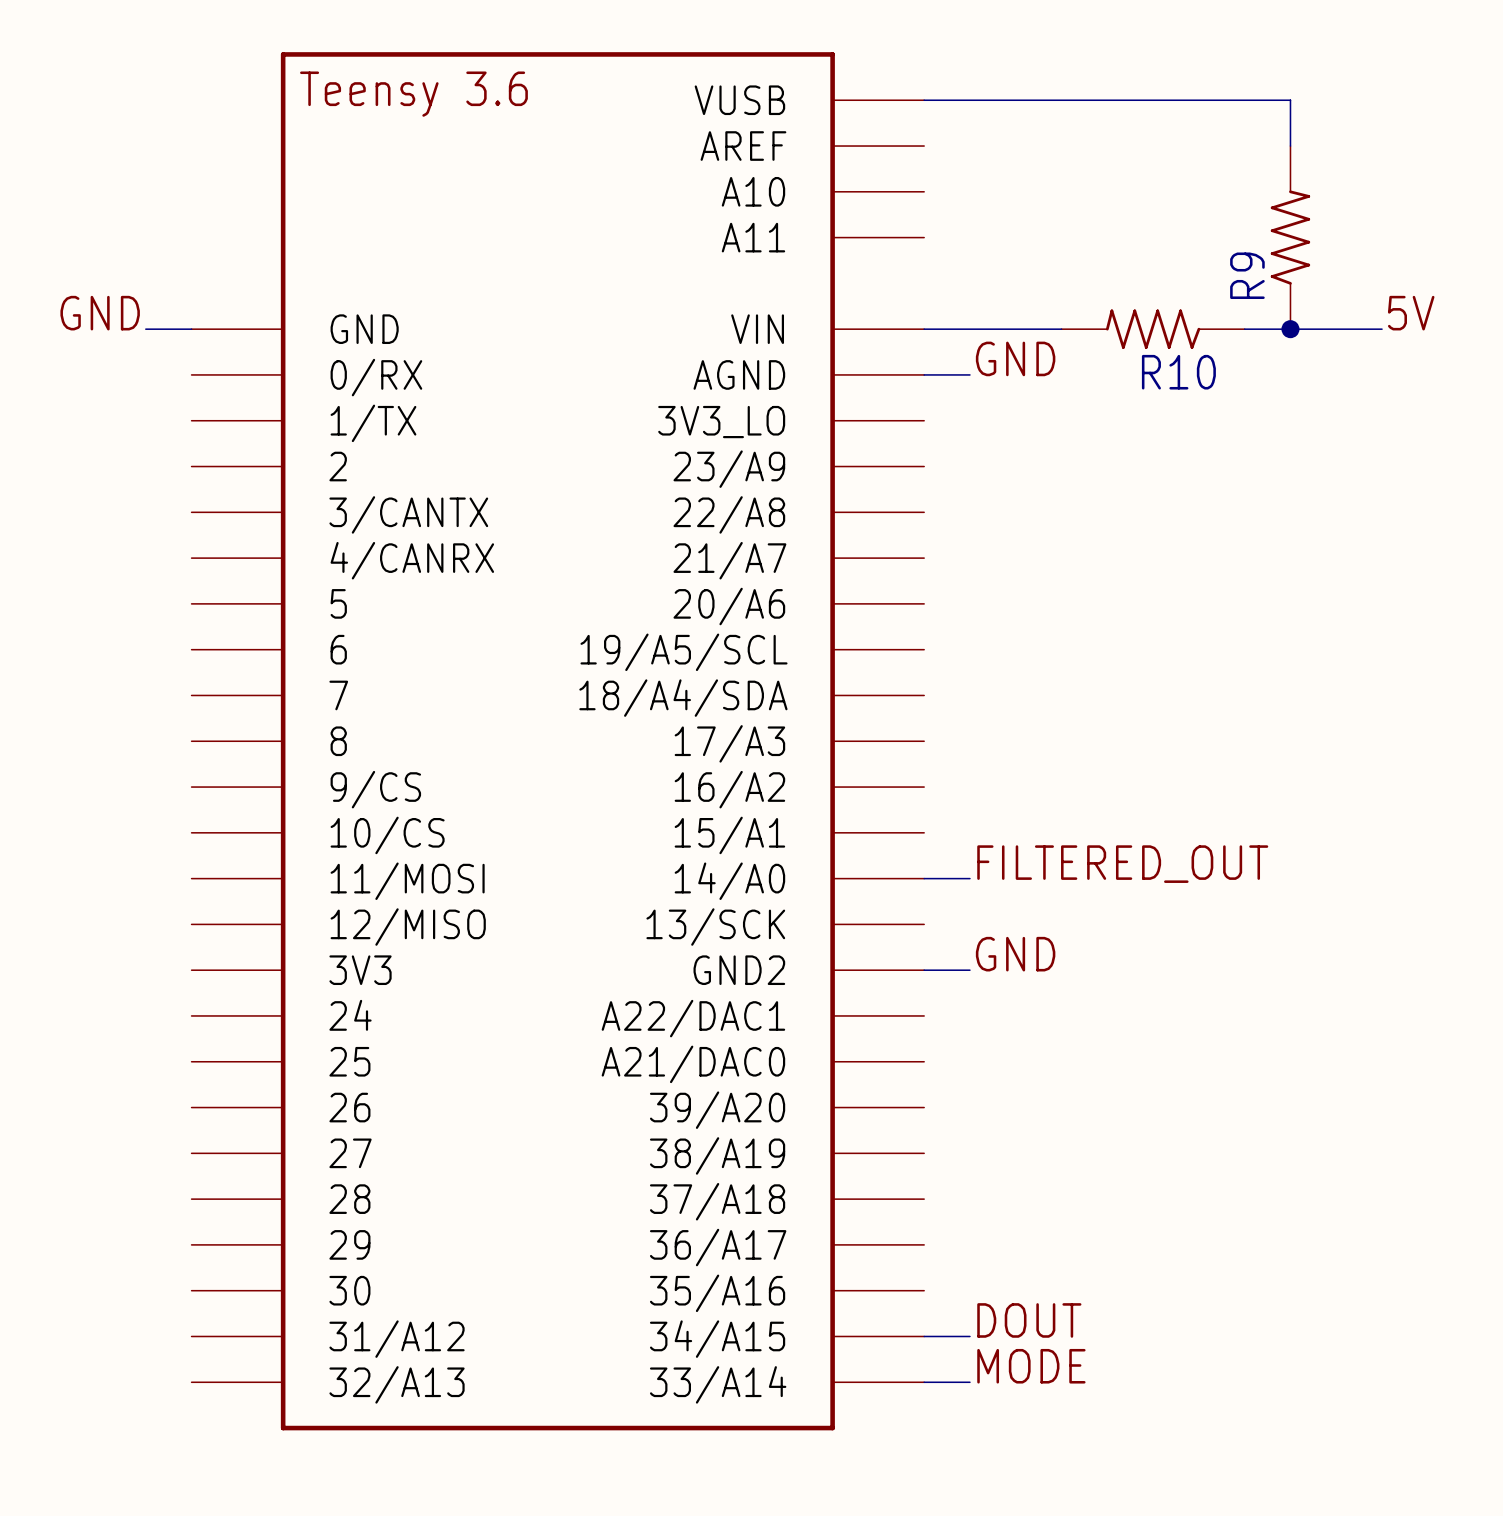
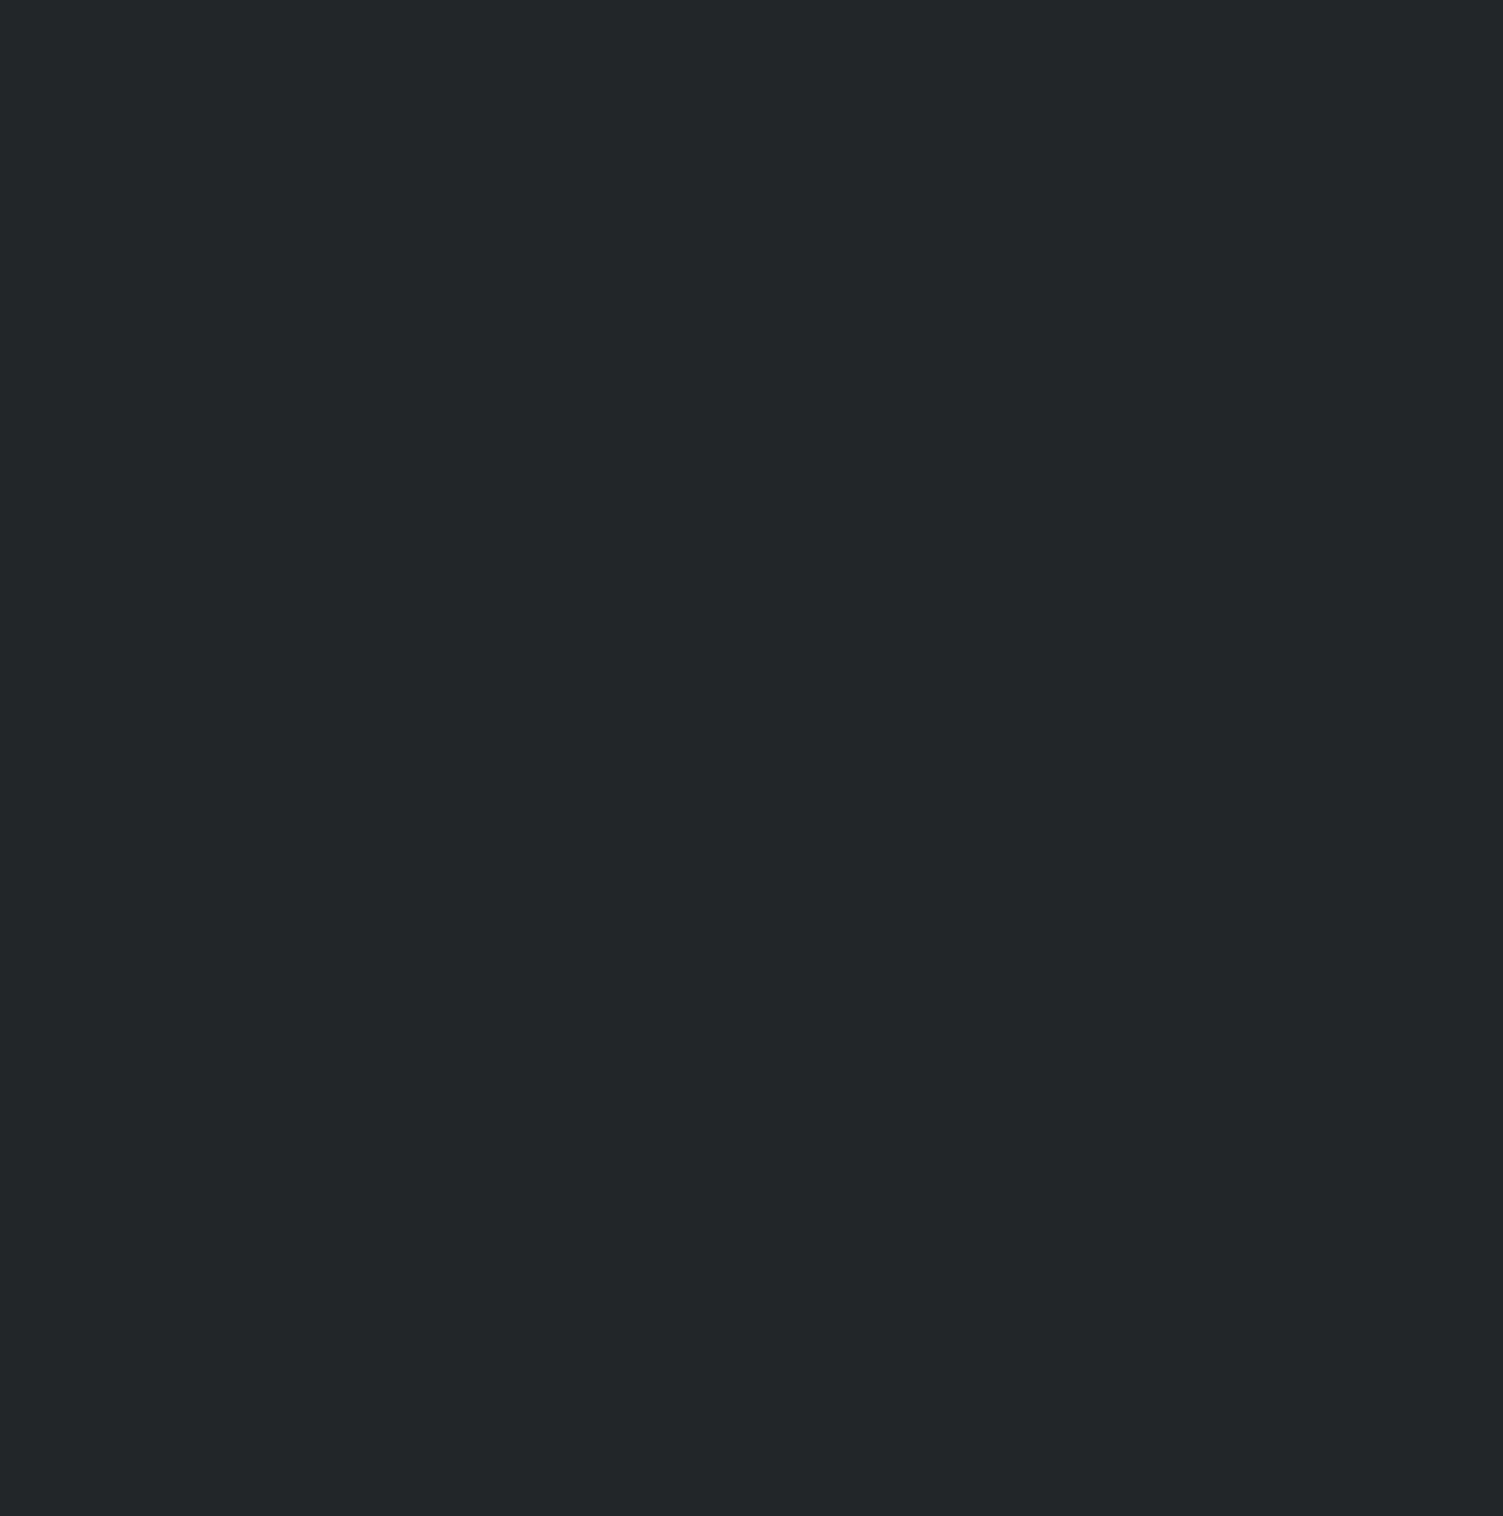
wire: (924, 100) (1290, 100) (1290, 146) -> none
R9: (1290, 237) -> none
label: GND (100, 313) -> none
label: 5V (1411, 313) -> none
wire: (145, 329) (191, 329) -> none
wire: (924, 329) (1061, 329) -> none
R10: (1153, 329) -> none
wire: (1244, 329) (1382, 329) -> none
junction: (1290, 329) -> none
label: GND (1015, 358) -> none
wire: (924, 374) (969, 374) -> none
part: (557, 741) -> none
label: FILTERED_OUT (1122, 864) -> none
wire: (924, 878) (969, 878) -> none
label: GND (1015, 954) -> none
wire: (924, 970) (969, 970) -> none
label: DOUT (1029, 1320) -> none
wire: (924, 1336) (969, 1336) -> none
label: MODE (1031, 1366) -> none
wire: (924, 1382) (969, 1382) -> none

